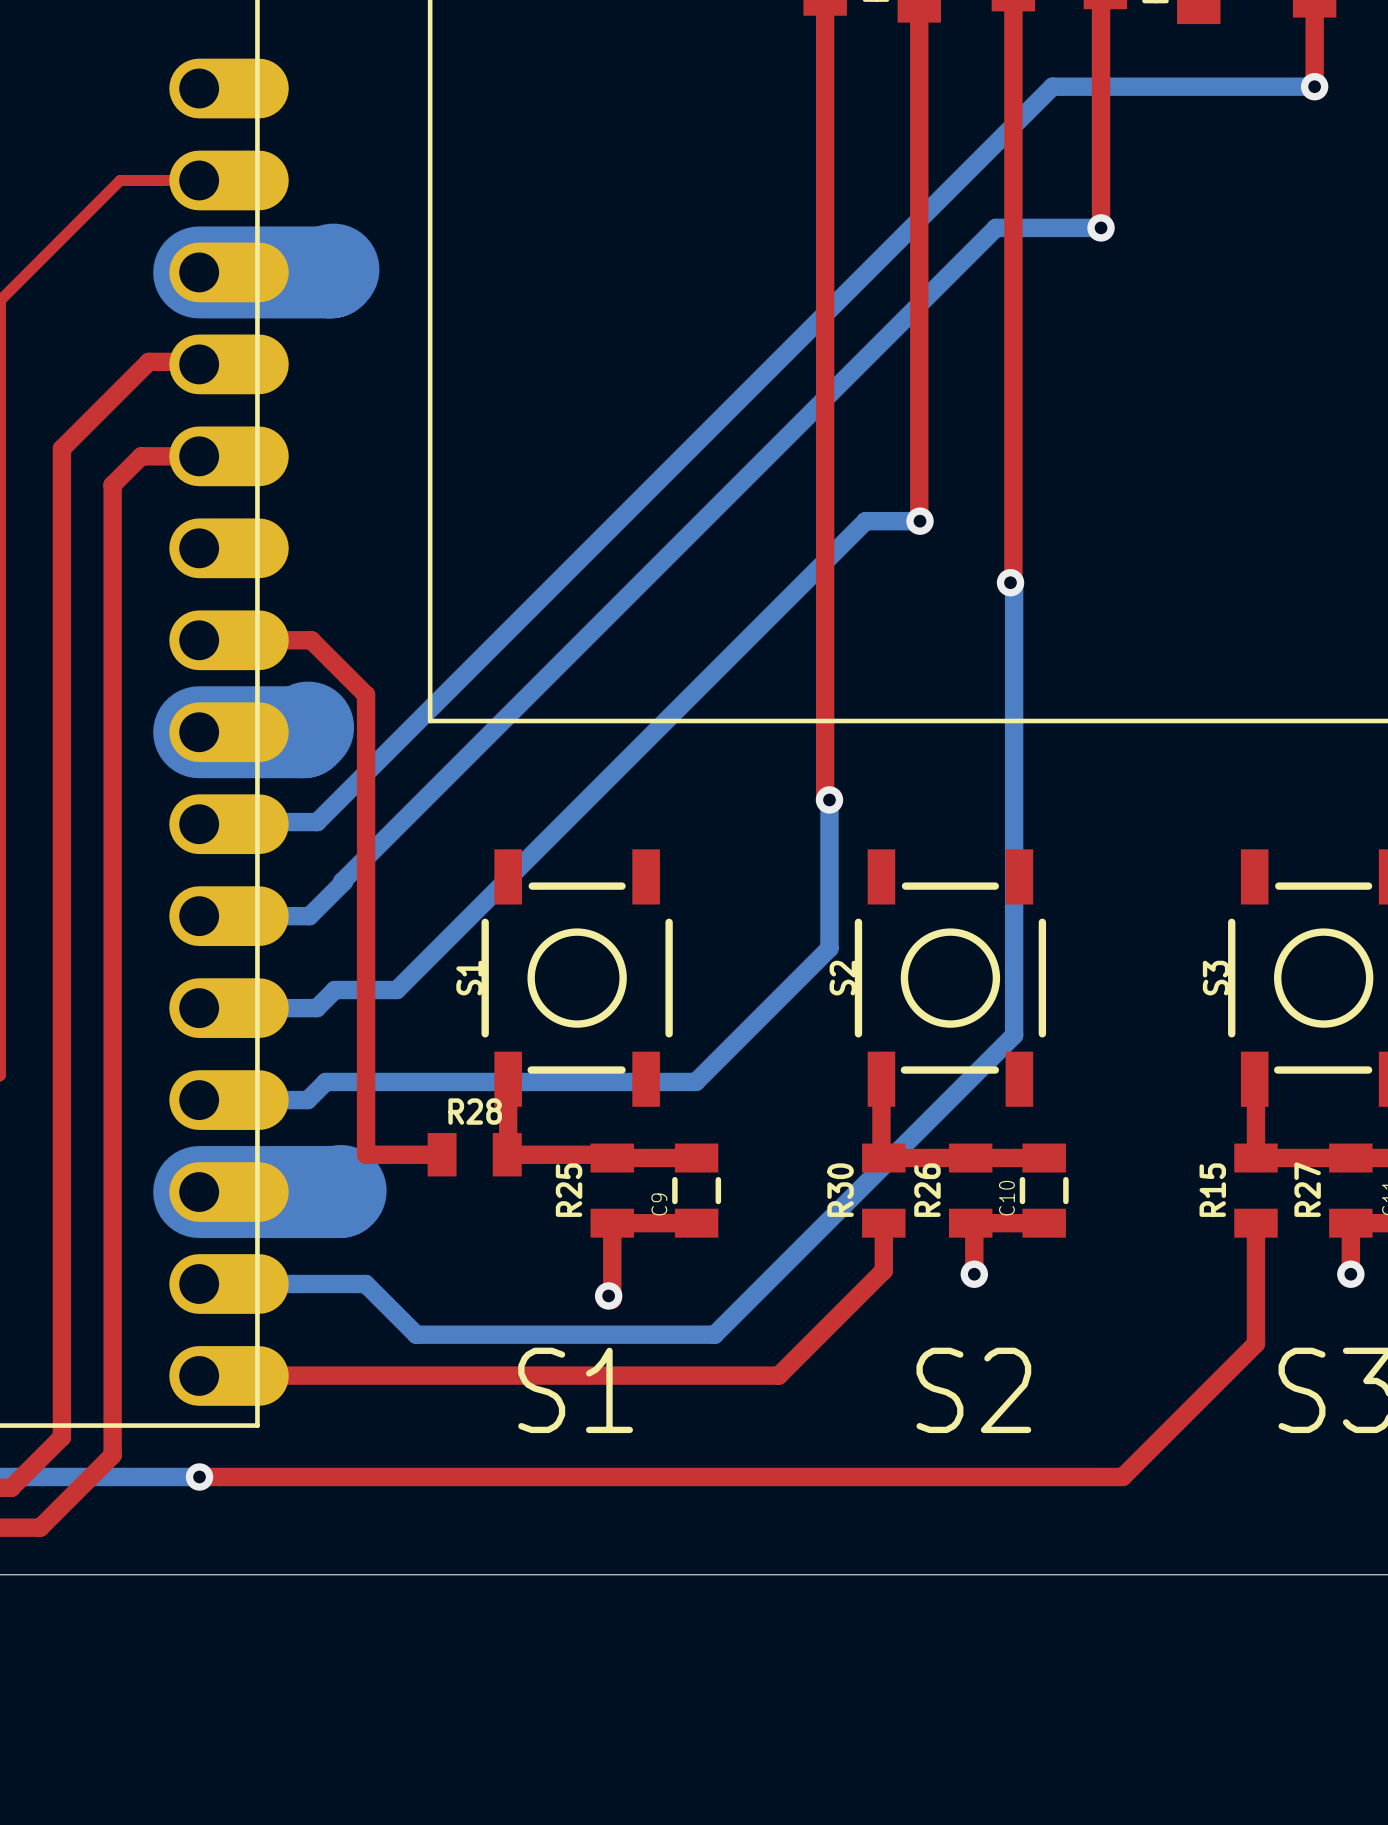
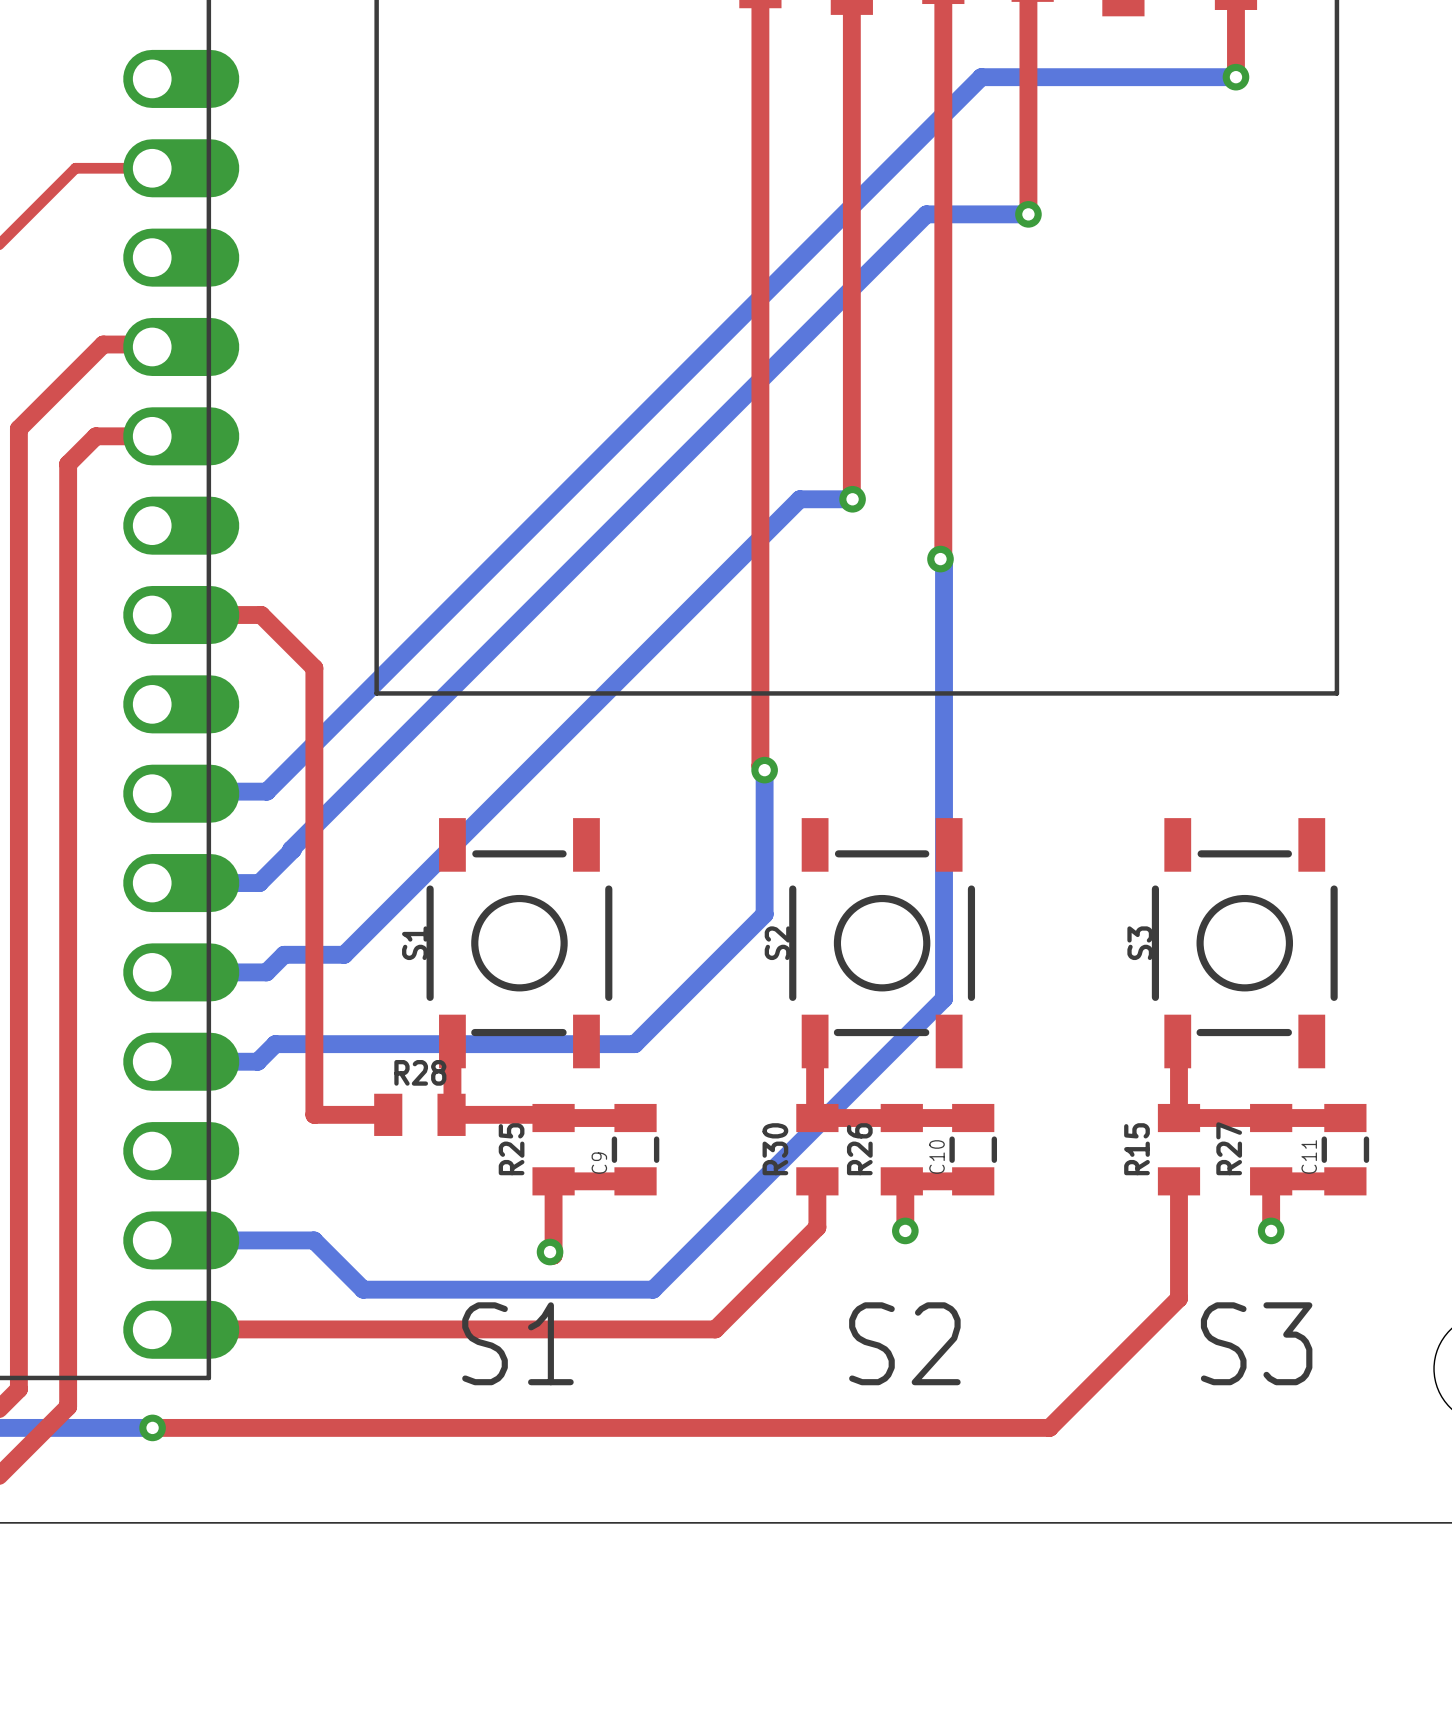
bottom track: (333, 269) (330, 272) (199, 272) -> none
bottom track: (308, 727) (303, 732) (199, 732) -> none
bottom track: (340, 1190) (199, 1192) -> none

